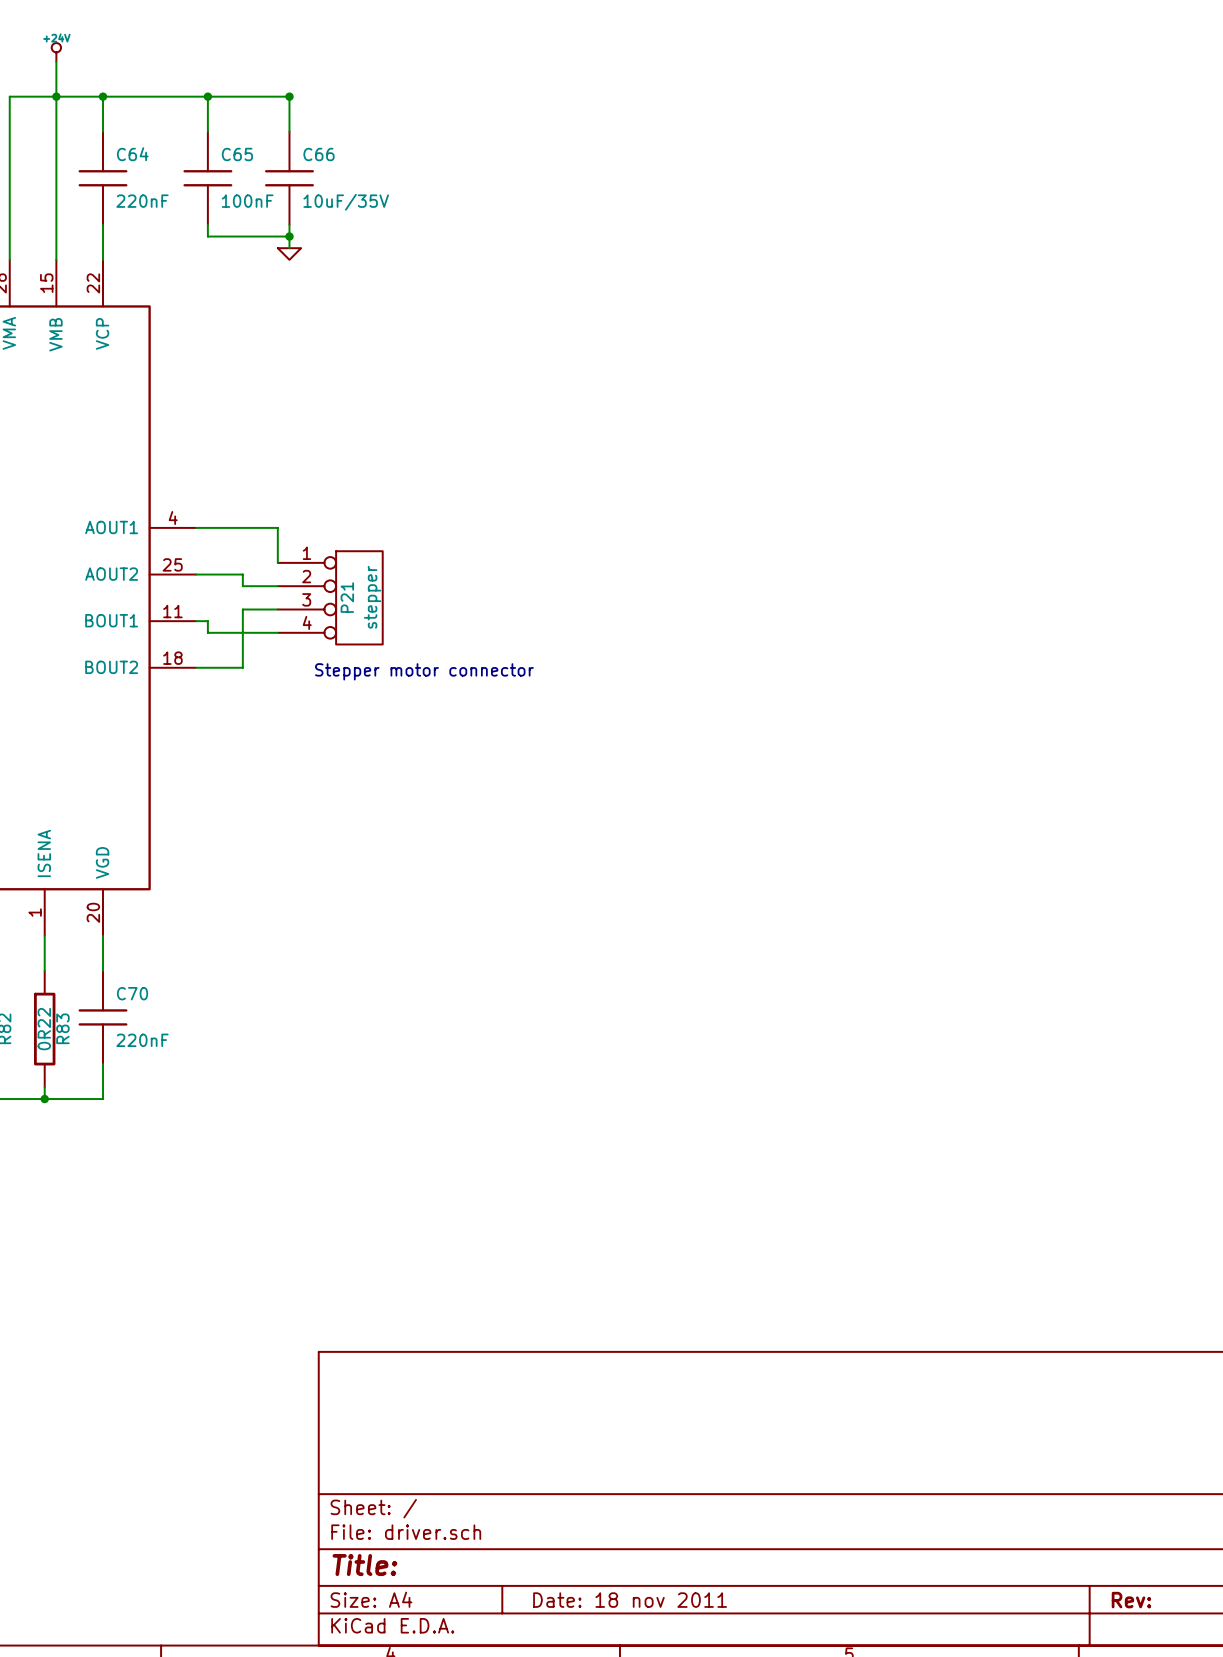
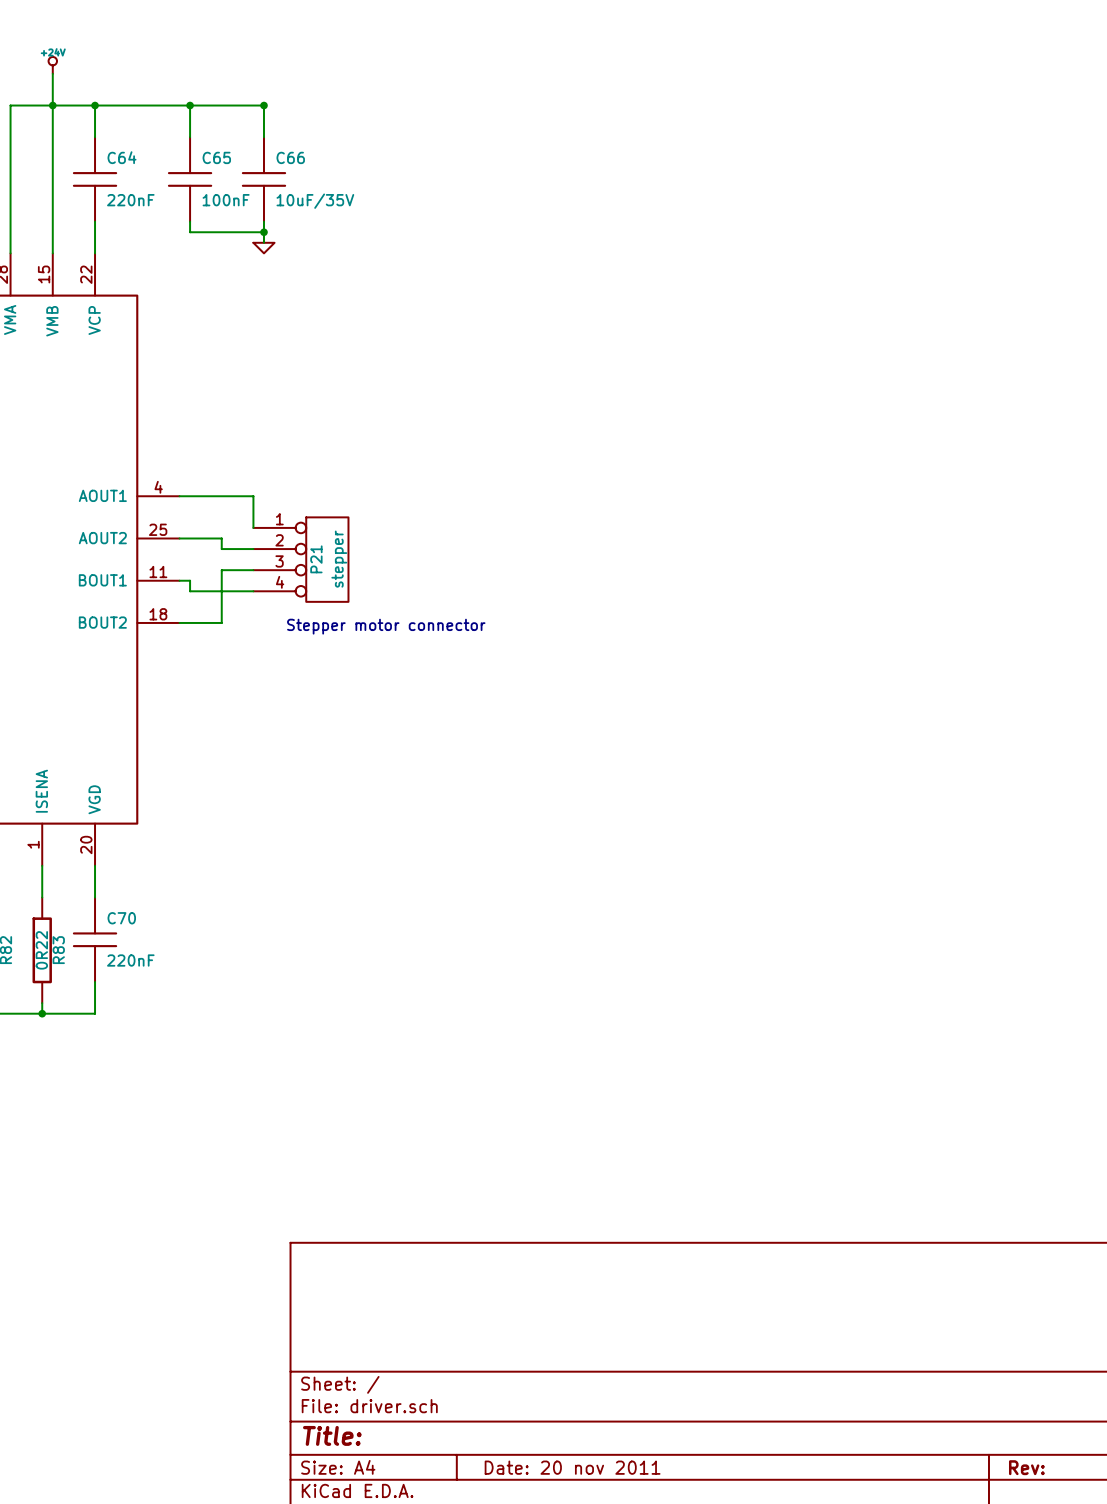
title block: Date: 18 nov 2011 (630, 1600) -> Date: 20 nov 2011 (572, 1467)

